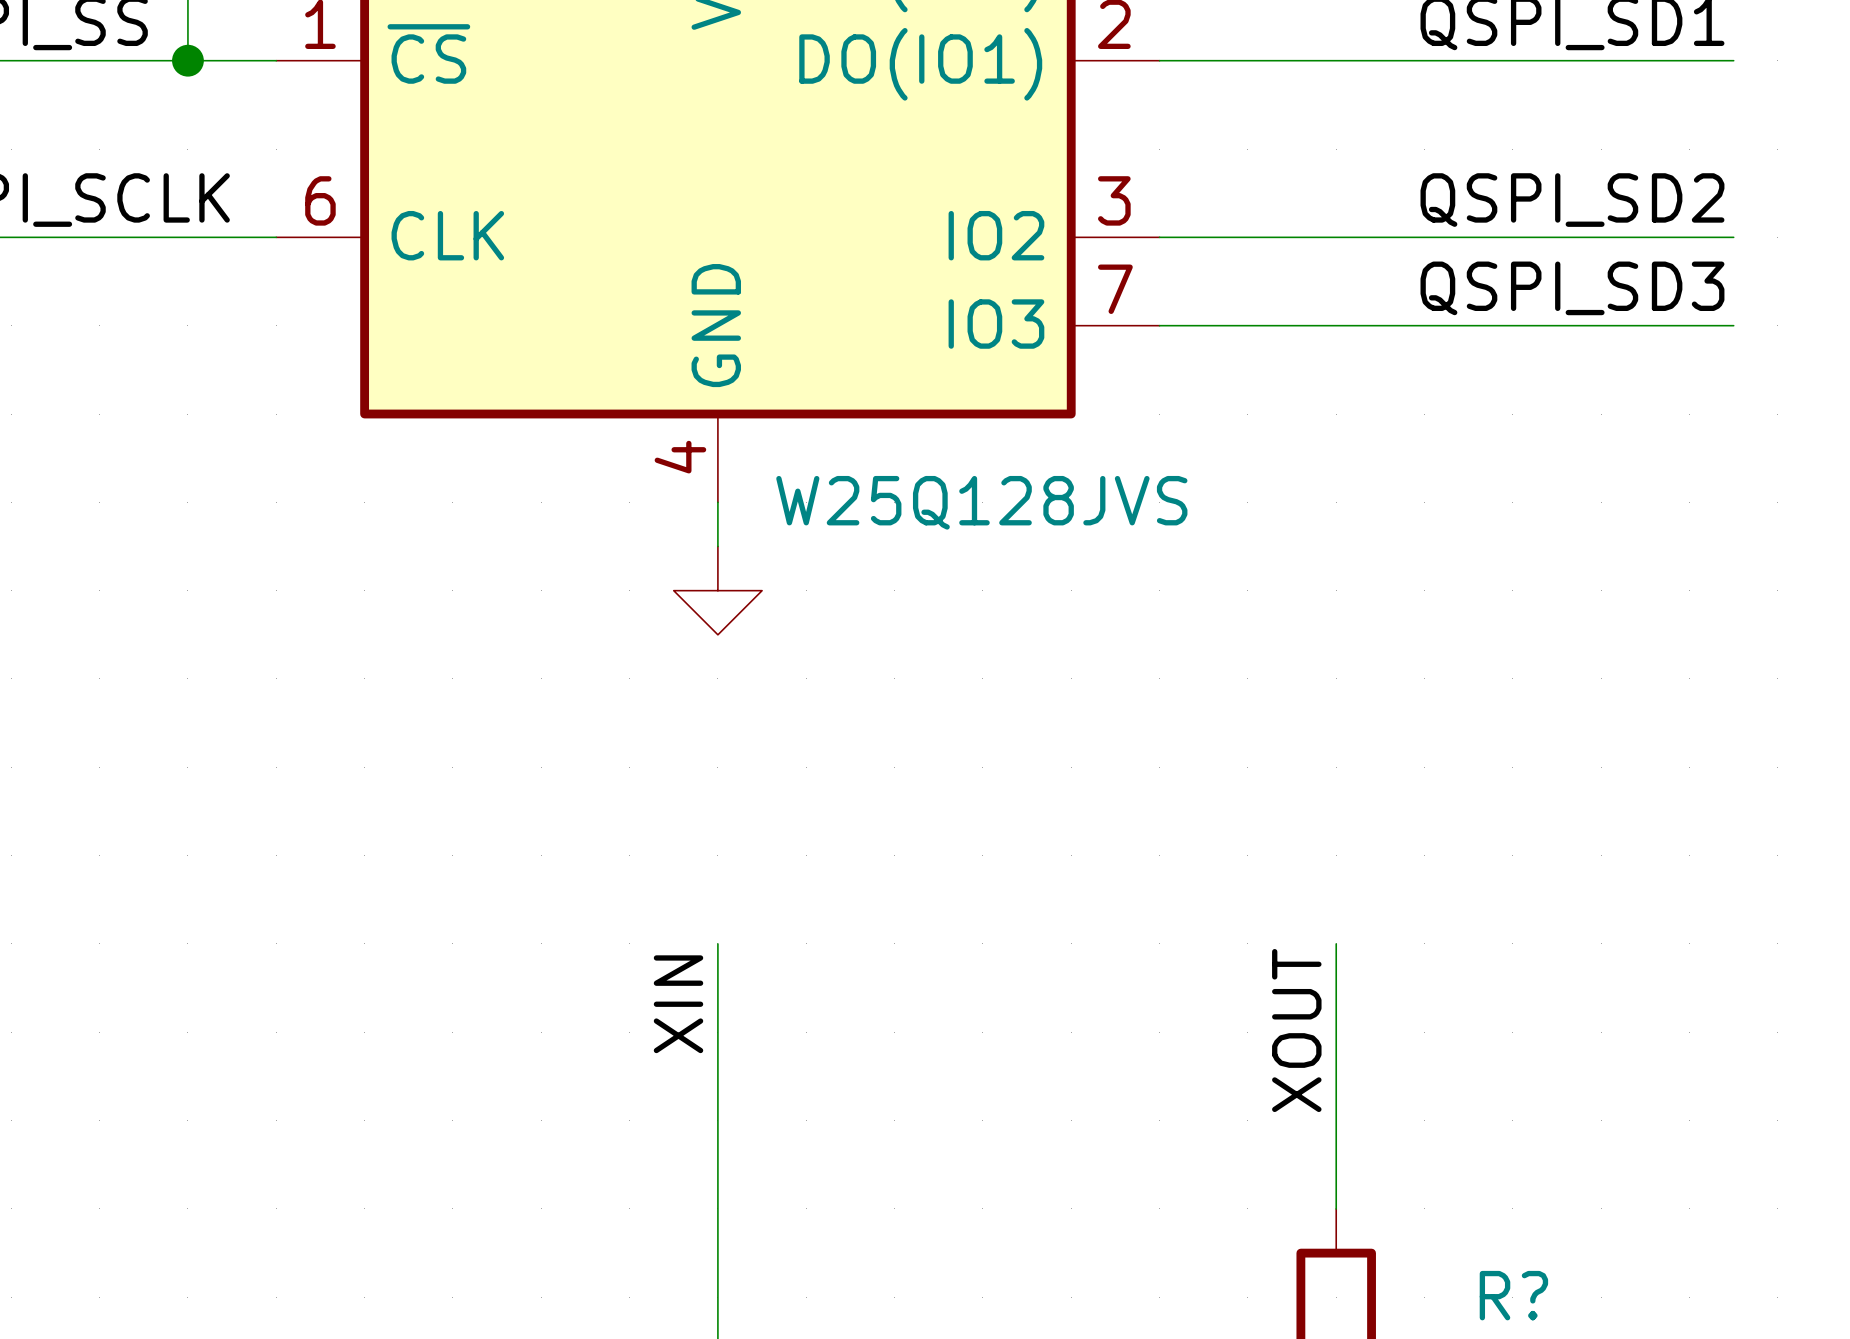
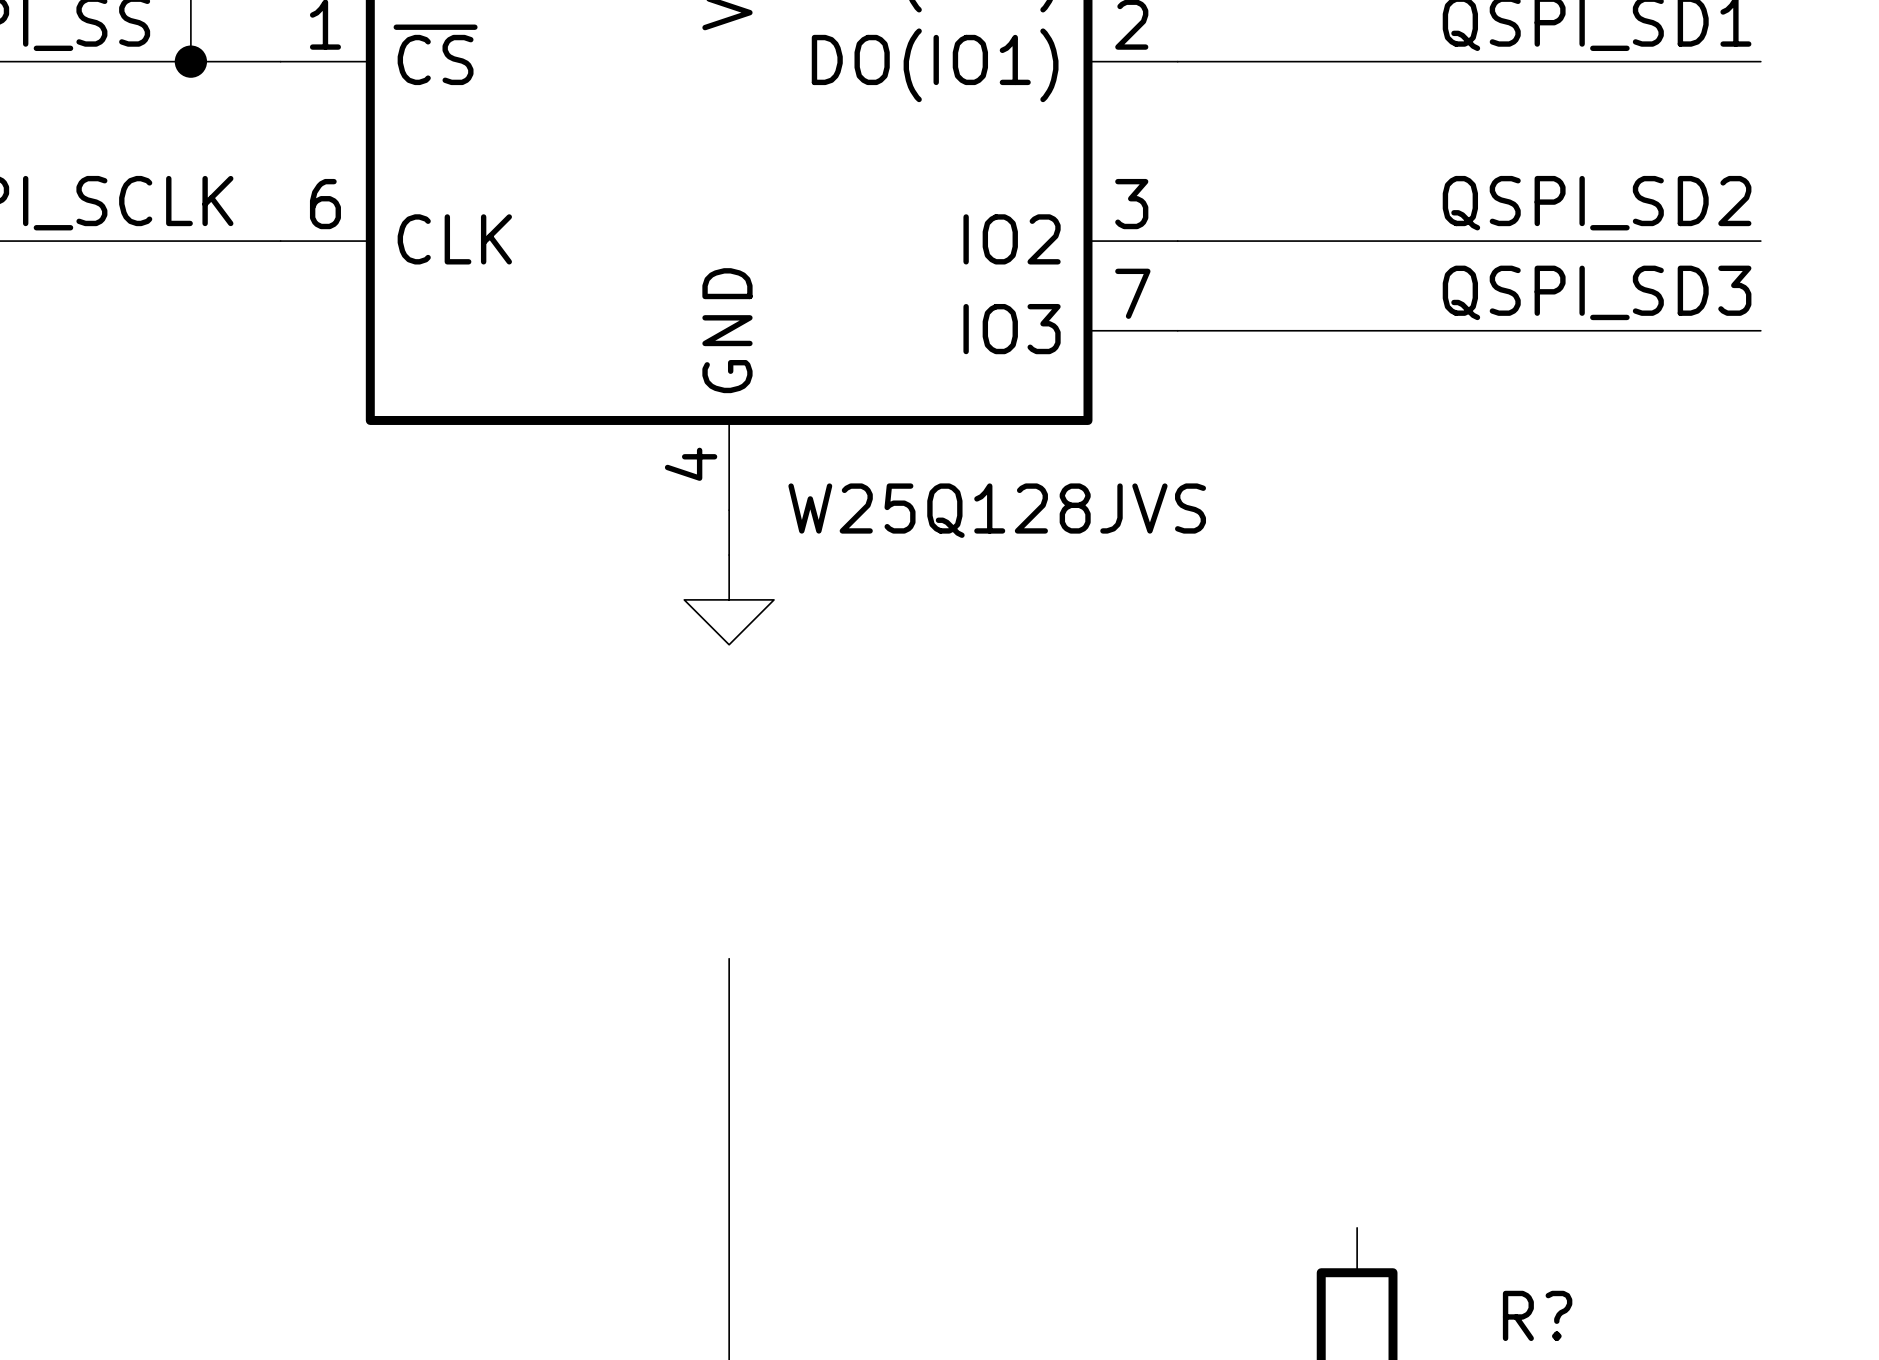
wire: (1336, 943) (1336, 1208) -> none
label: XIN (678, 1004) -> none
label: XOUT (1296, 1030) -> none

